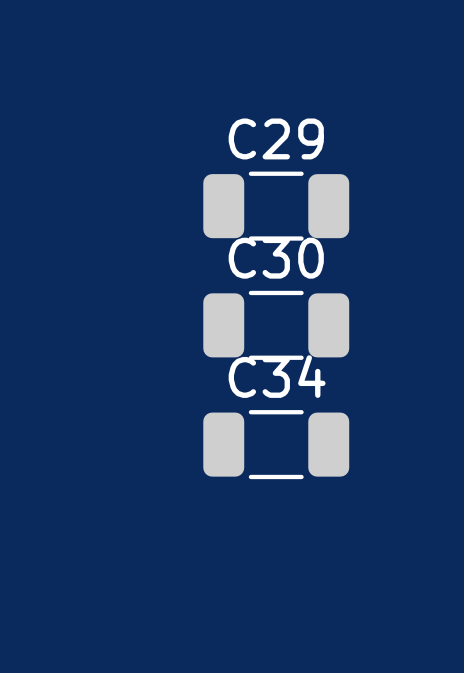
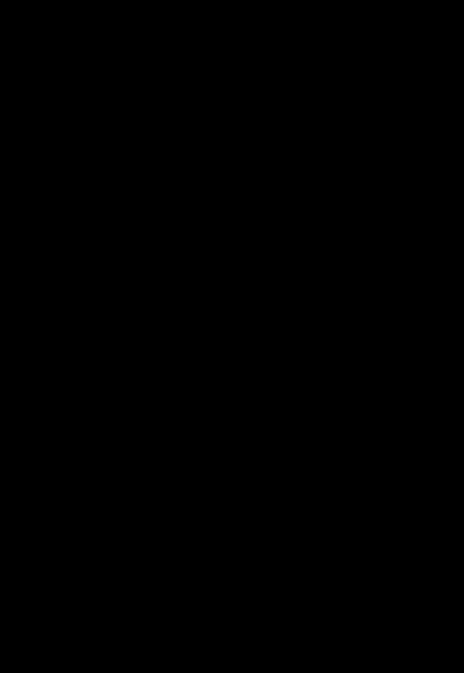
C29: (276, 206) -> none
C30: (276, 325) -> none
C34: (276, 444) -> none

